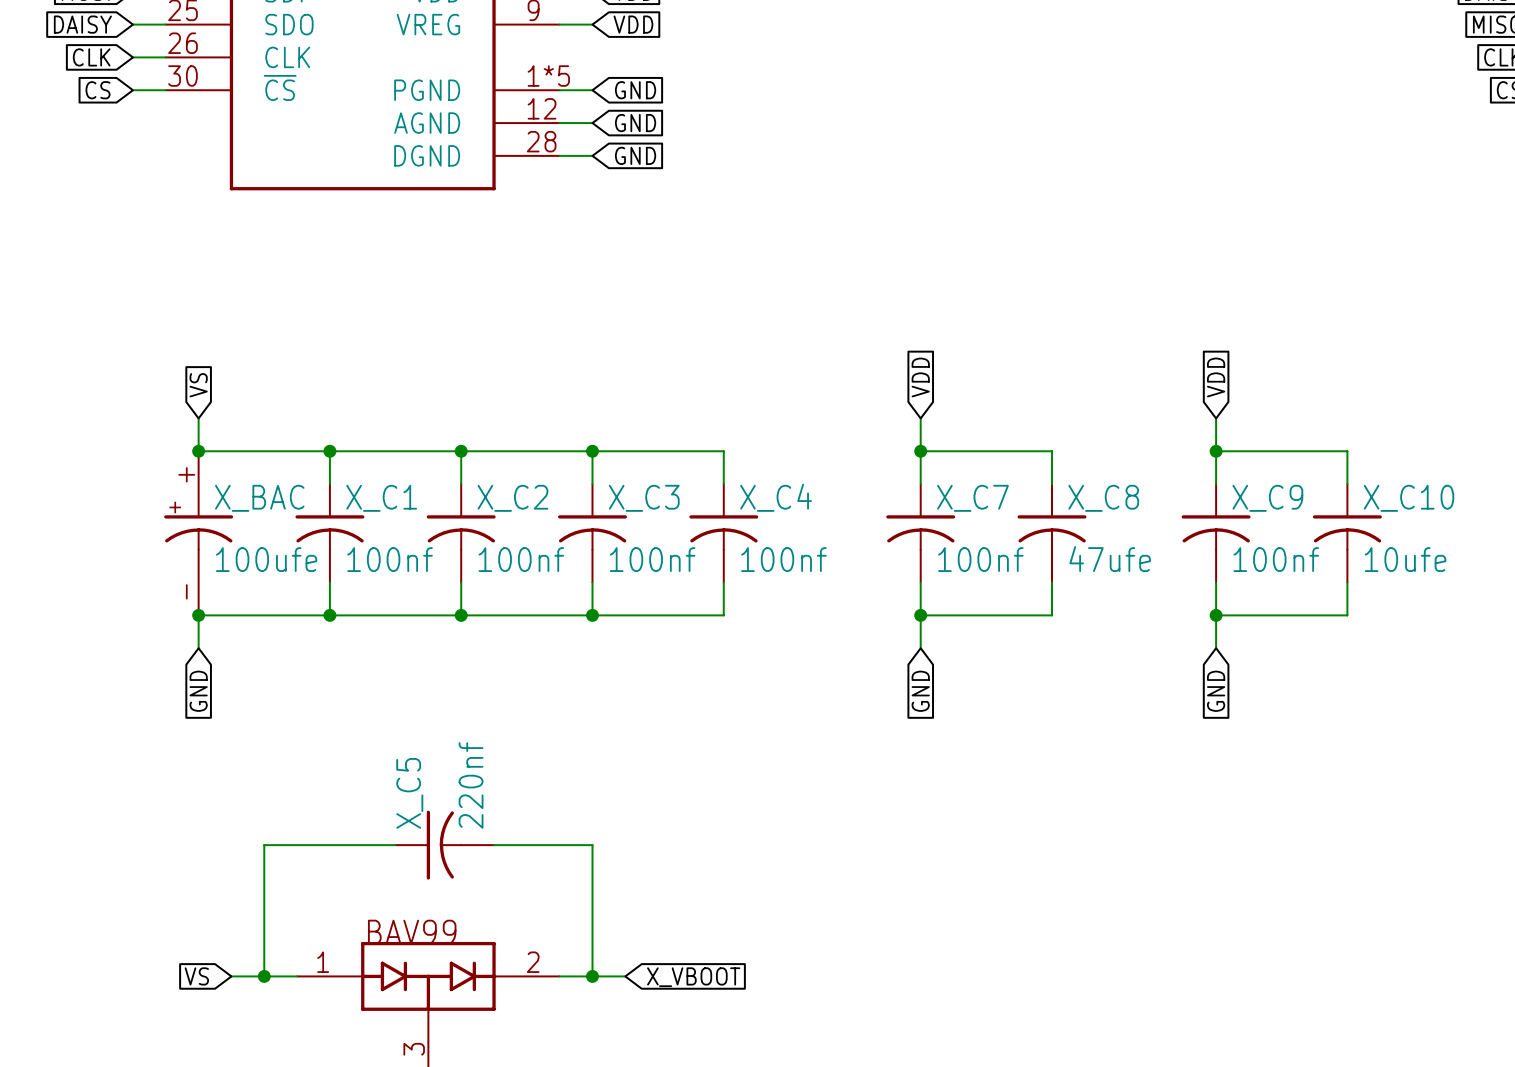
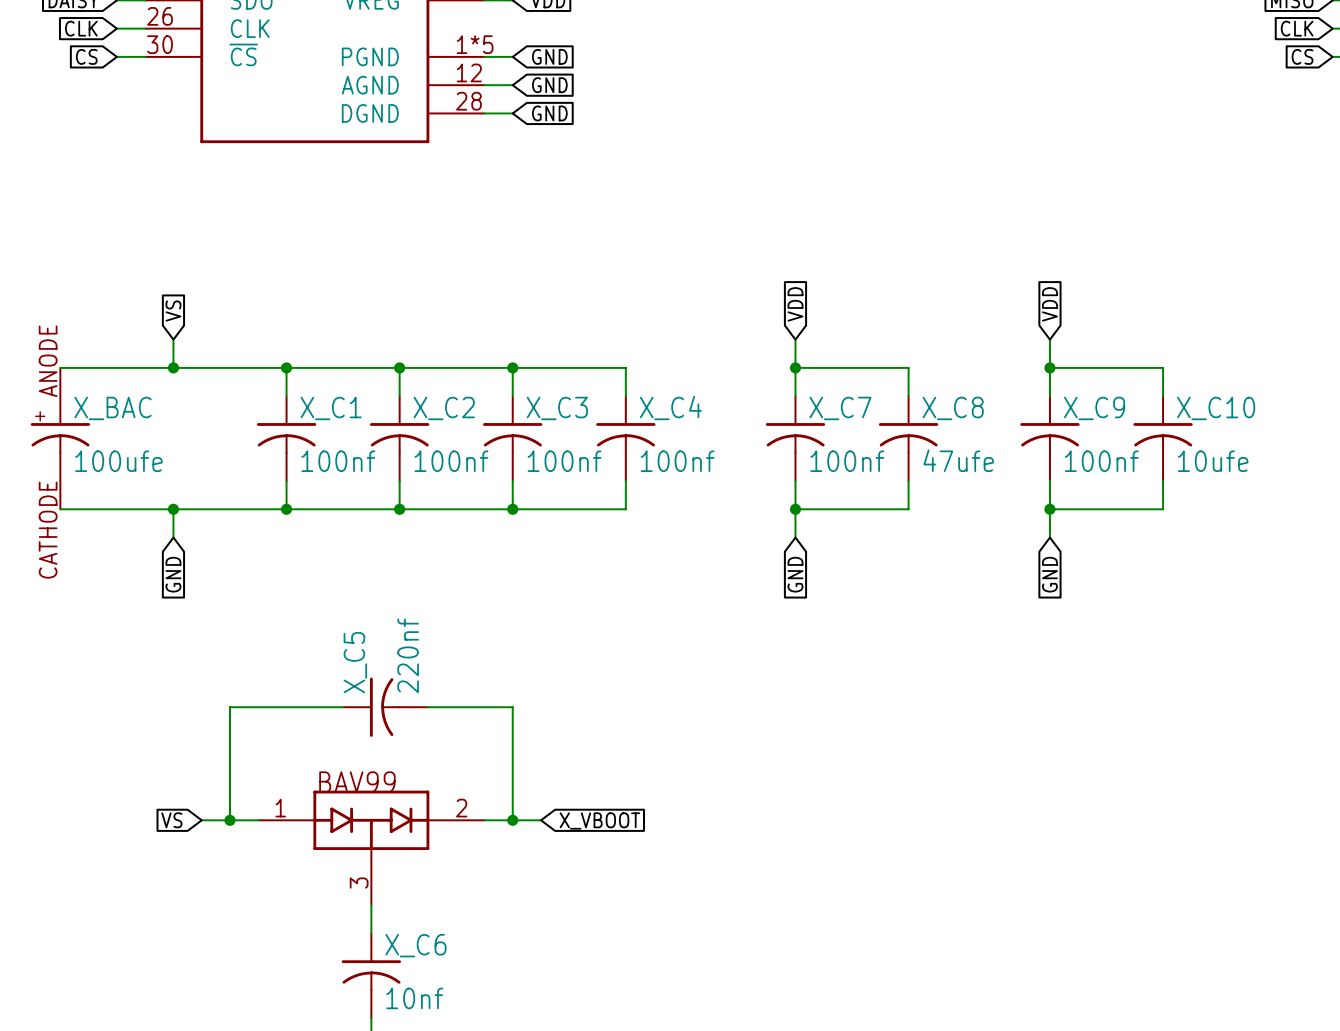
wire: none -> (60, 367) (173, 367)
X_BAC: none -> 100ufe (60, 438)
X_BAC: 100ufe (198, 533) -> none
wire: none -> (60, 509) (173, 509)

